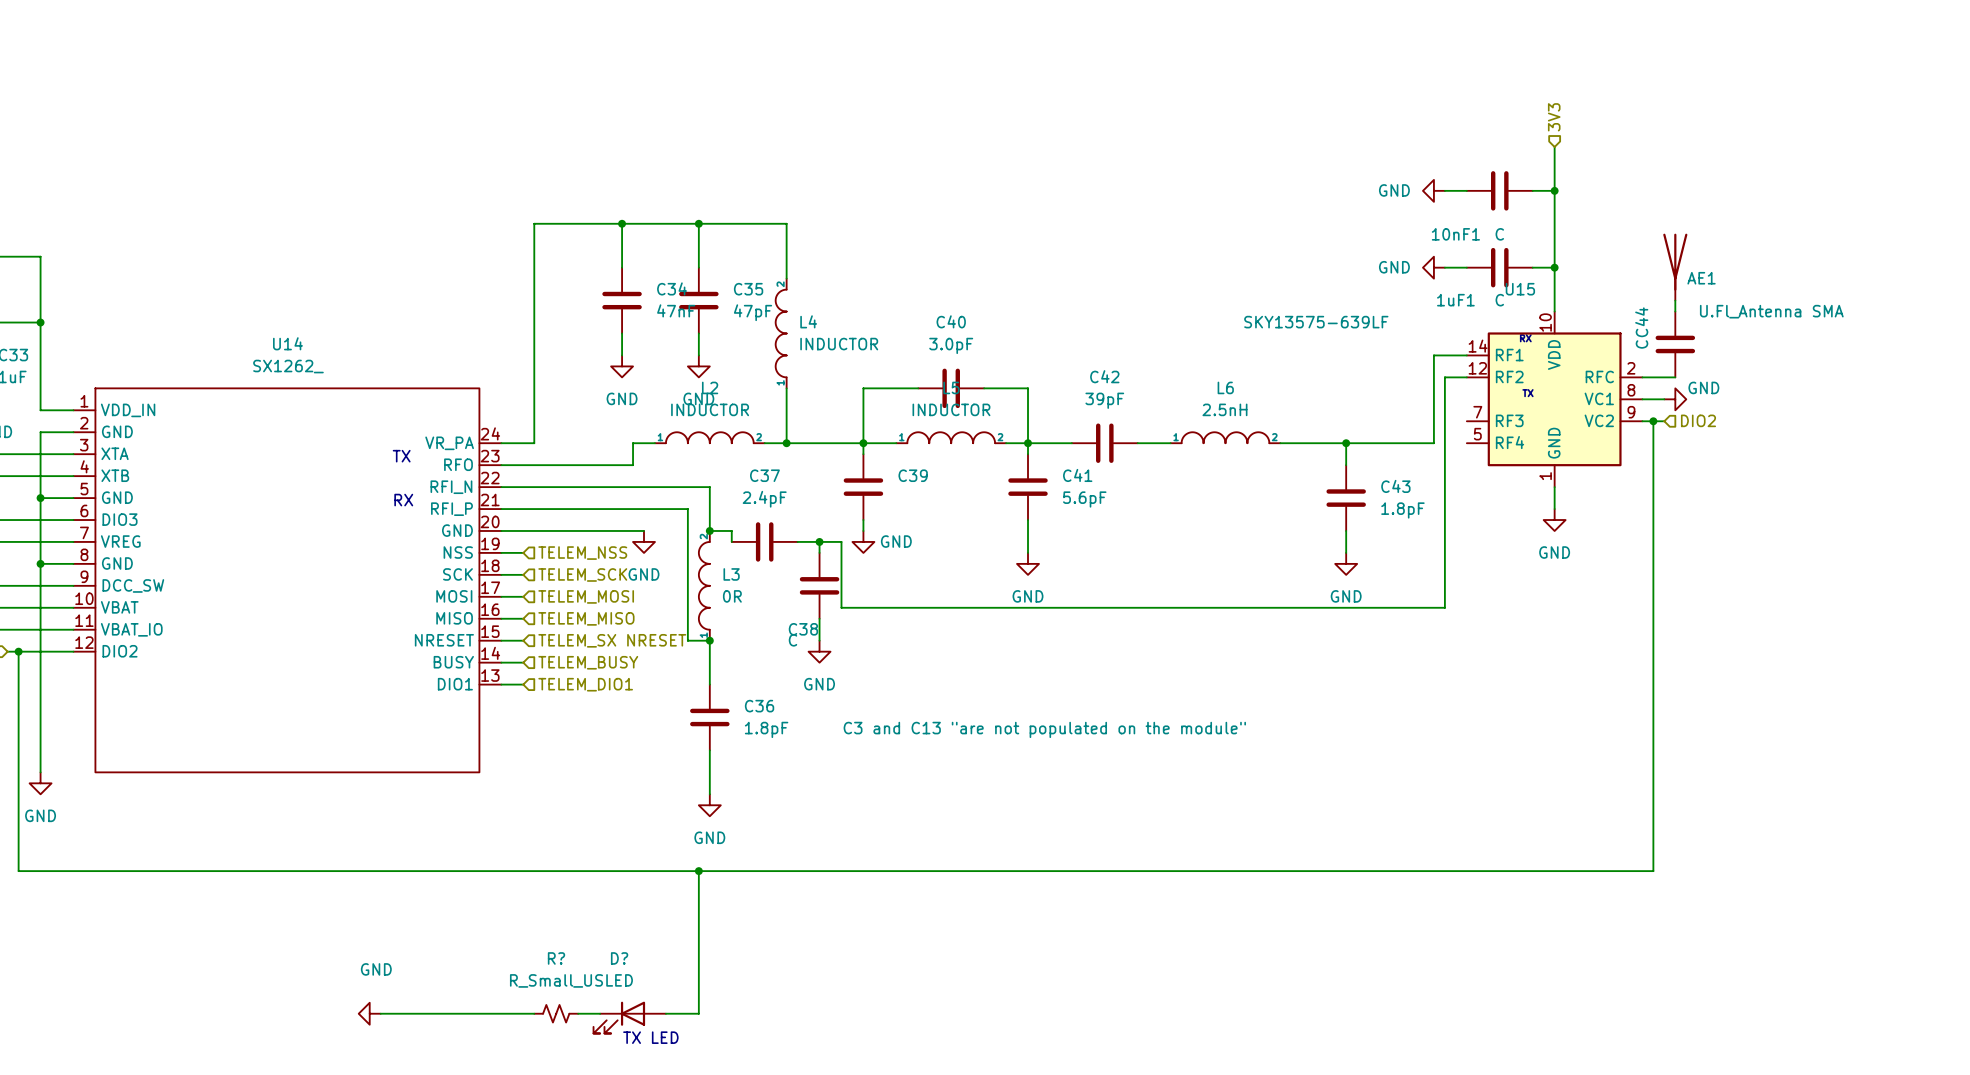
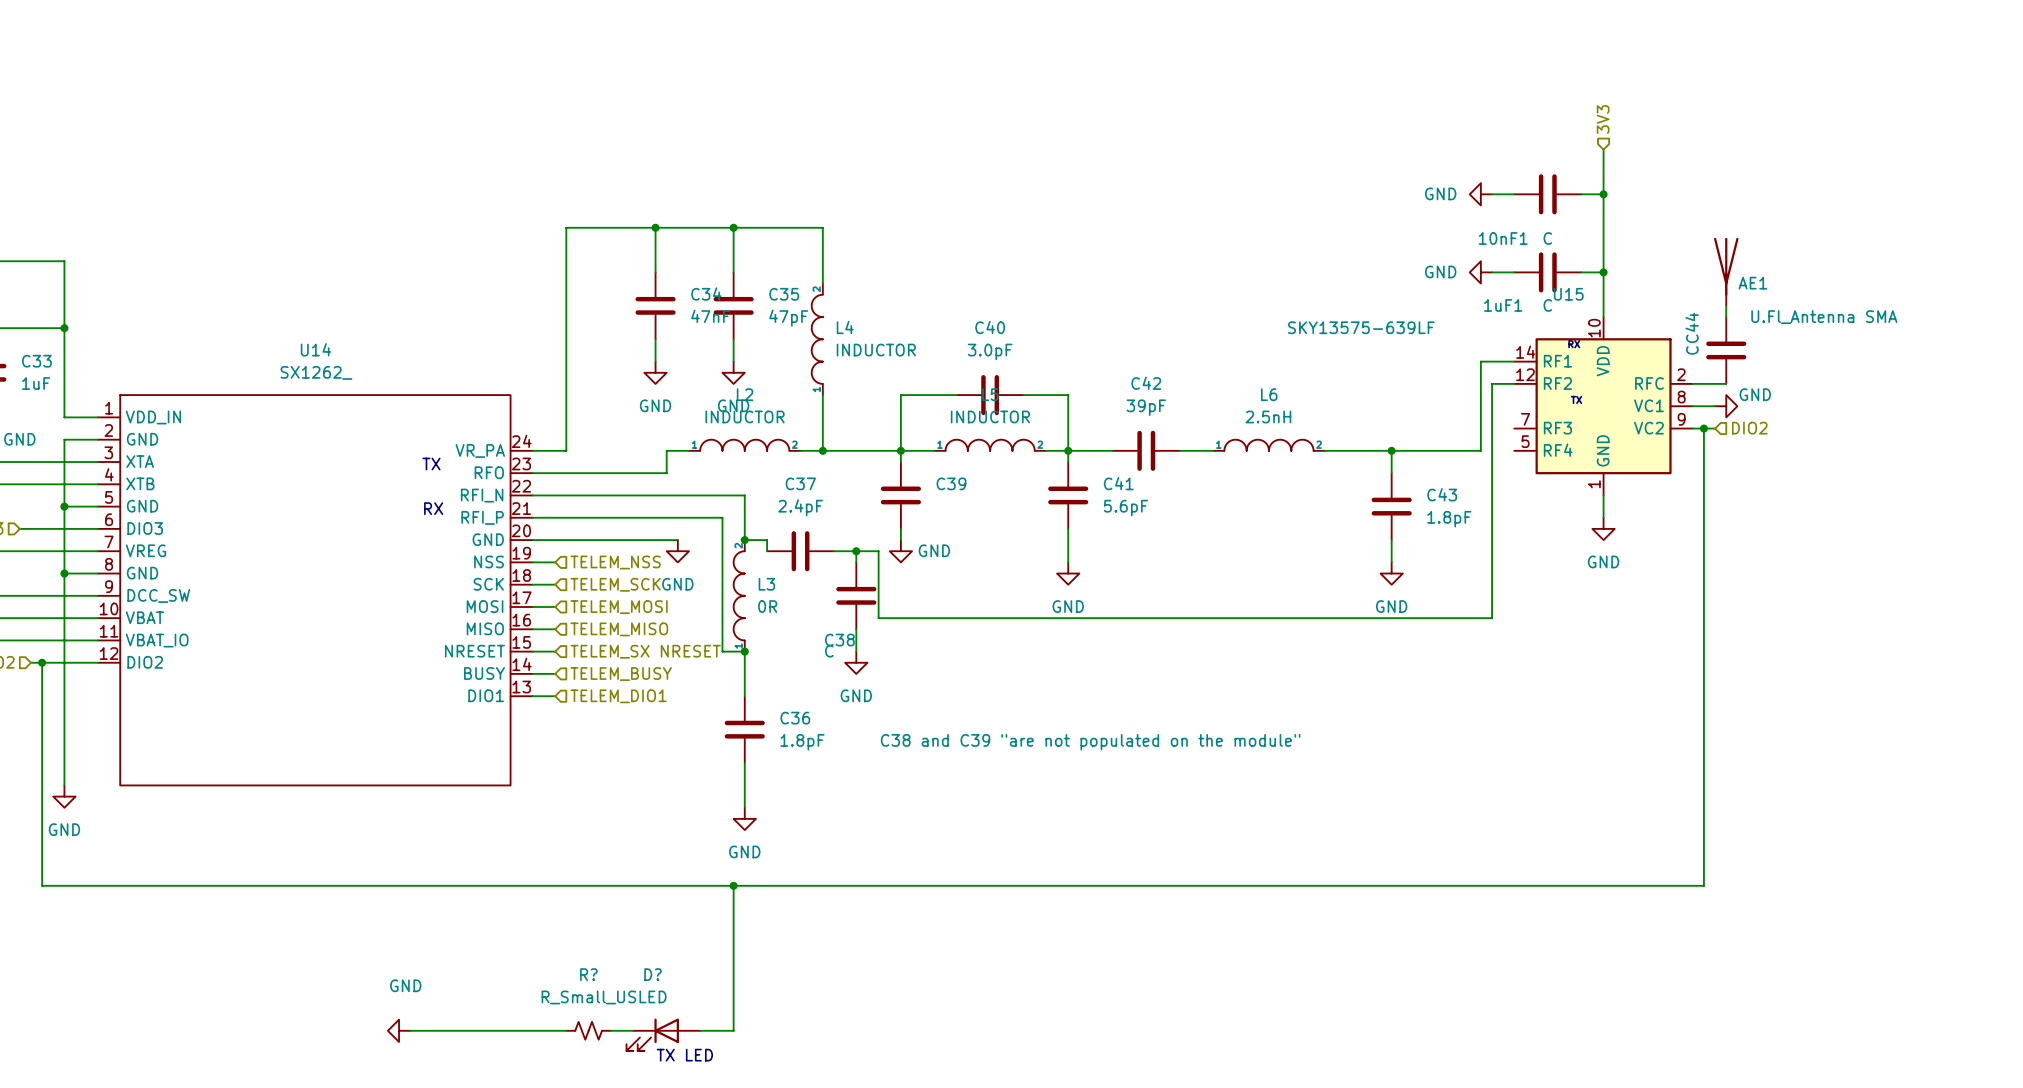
C39 value: C3 and C13 "are not populated on the module" (1044, 729) -> C38 and C39 "are not populated on the module" (1090, 742)

